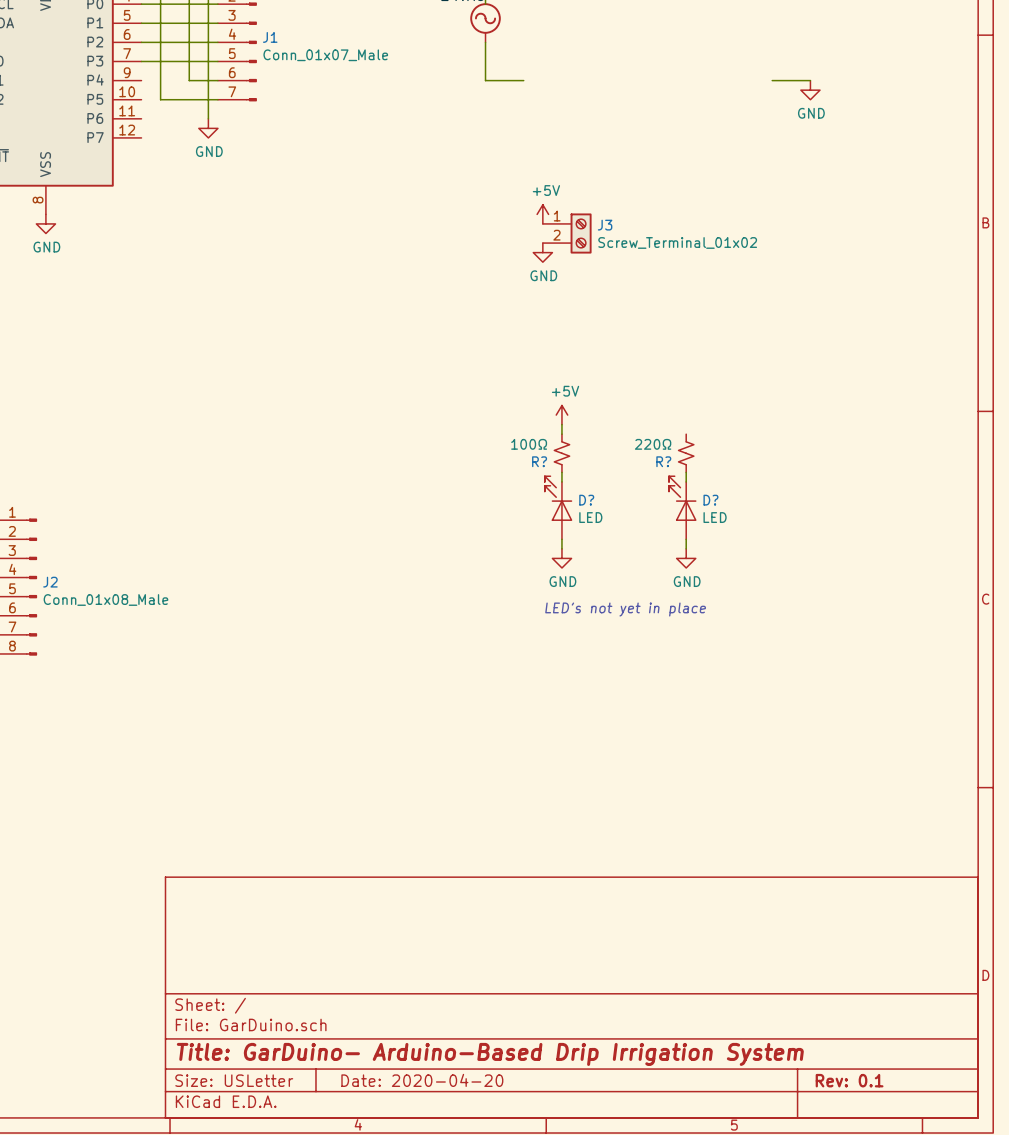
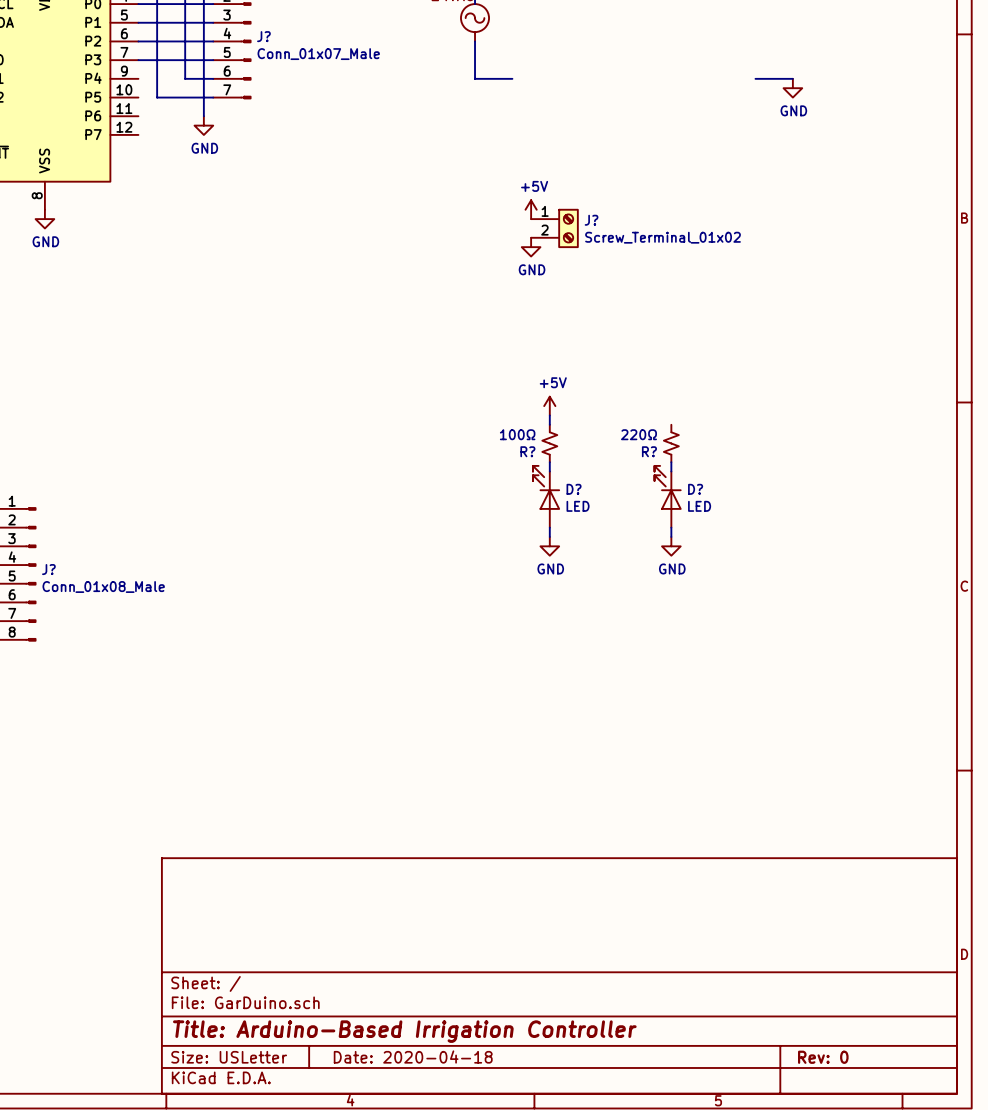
J1 name: J1 (270, 37) -> J? (263, 36)
J3 name: J3 (605, 225) -> J? (591, 220)
J2 name: J2 (50, 582) -> J? (48, 569)
text: LED's not yet in place (625, 609) -> none
title block: Title: GarDuino- Arduino-Based Drip Irrigation System (490, 1054) -> Title: Arduino-Based Irrigation Controller (404, 1031)
title block: Date: 2020-04-20 (422, 1080) -> Date: 2020-04-18 (413, 1057)
title block: Rev: 0.1 (849, 1080) -> Rev: 0 (823, 1057)

